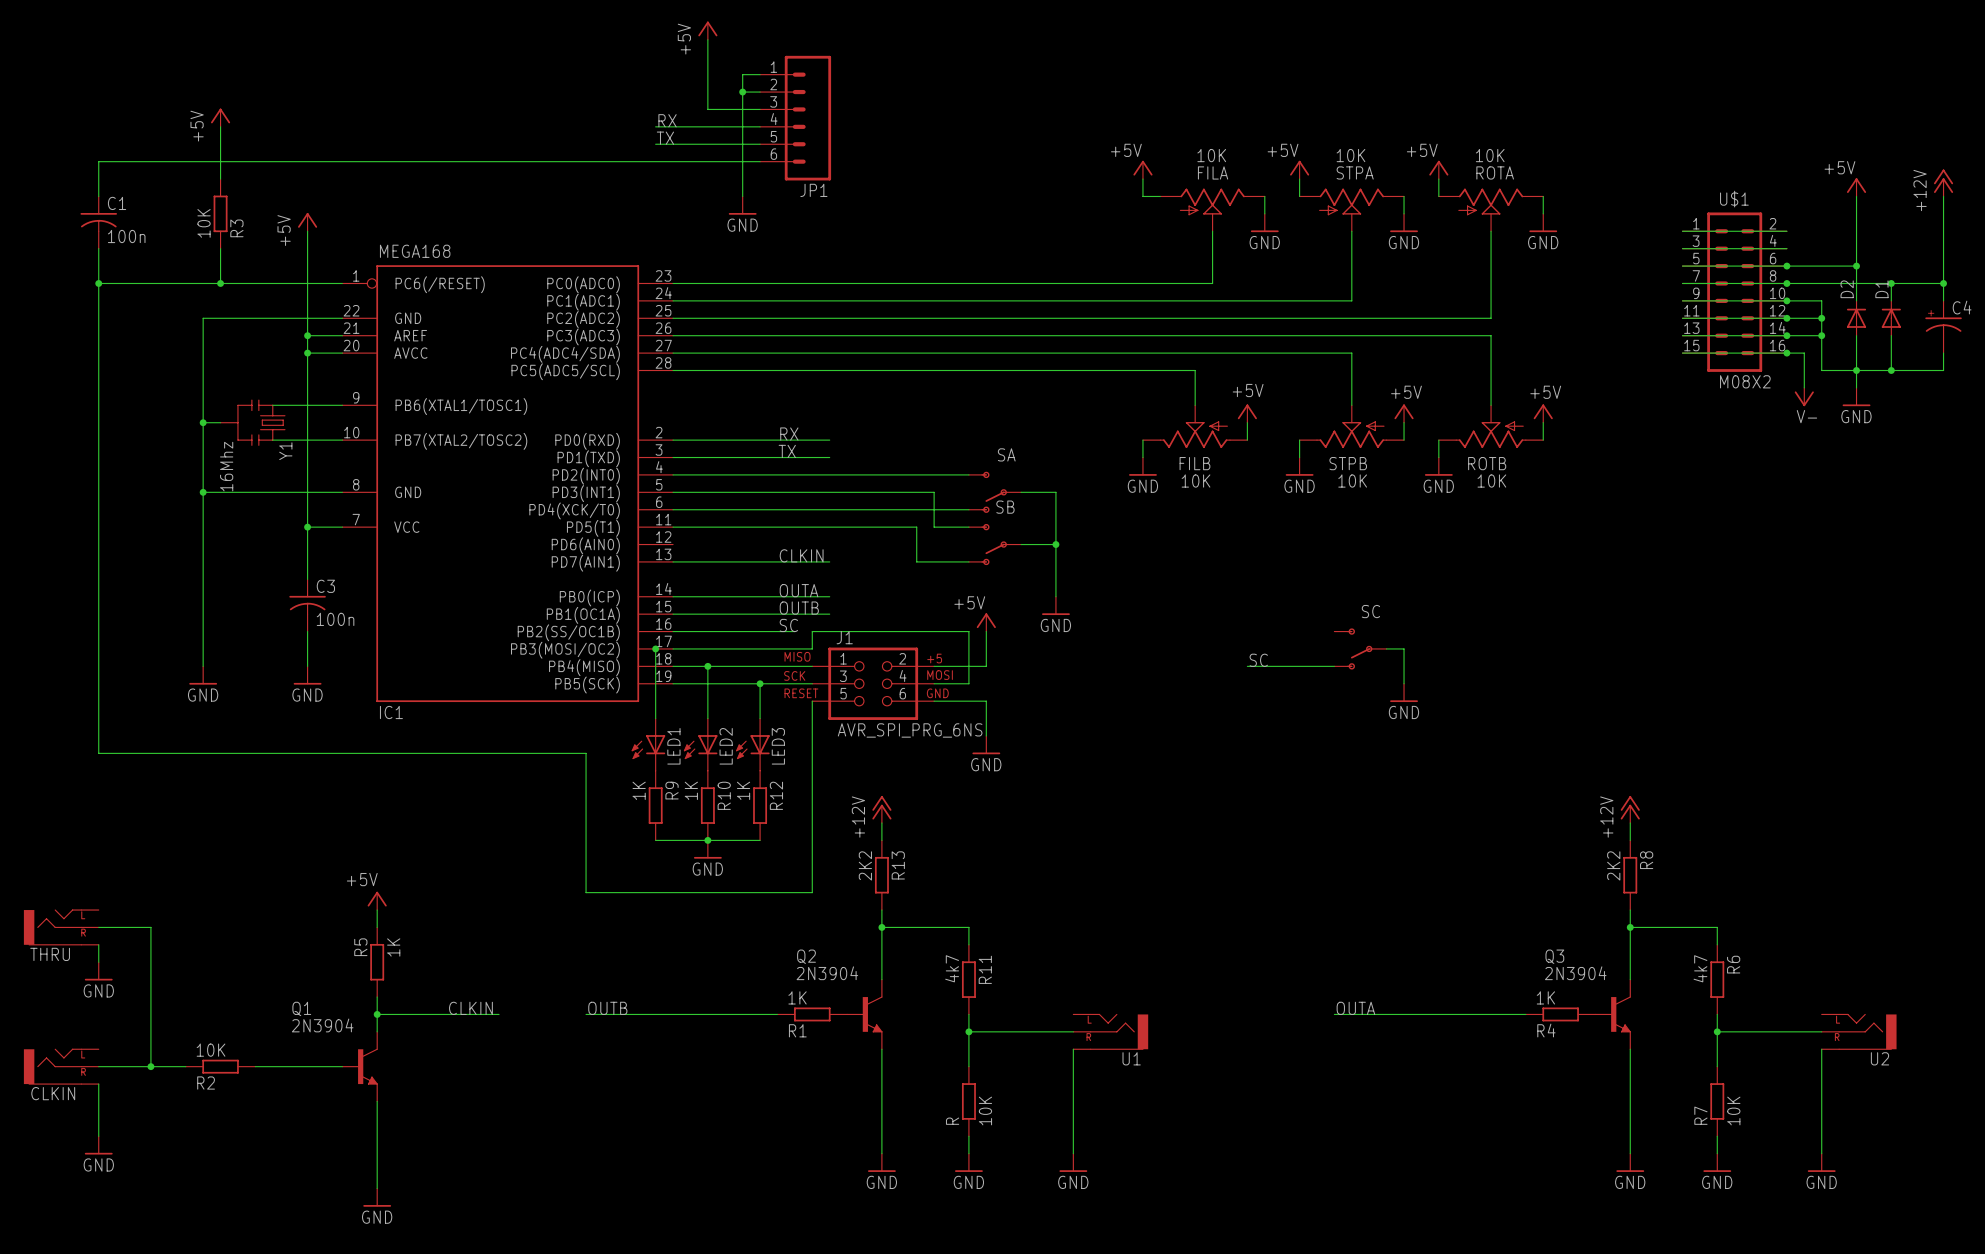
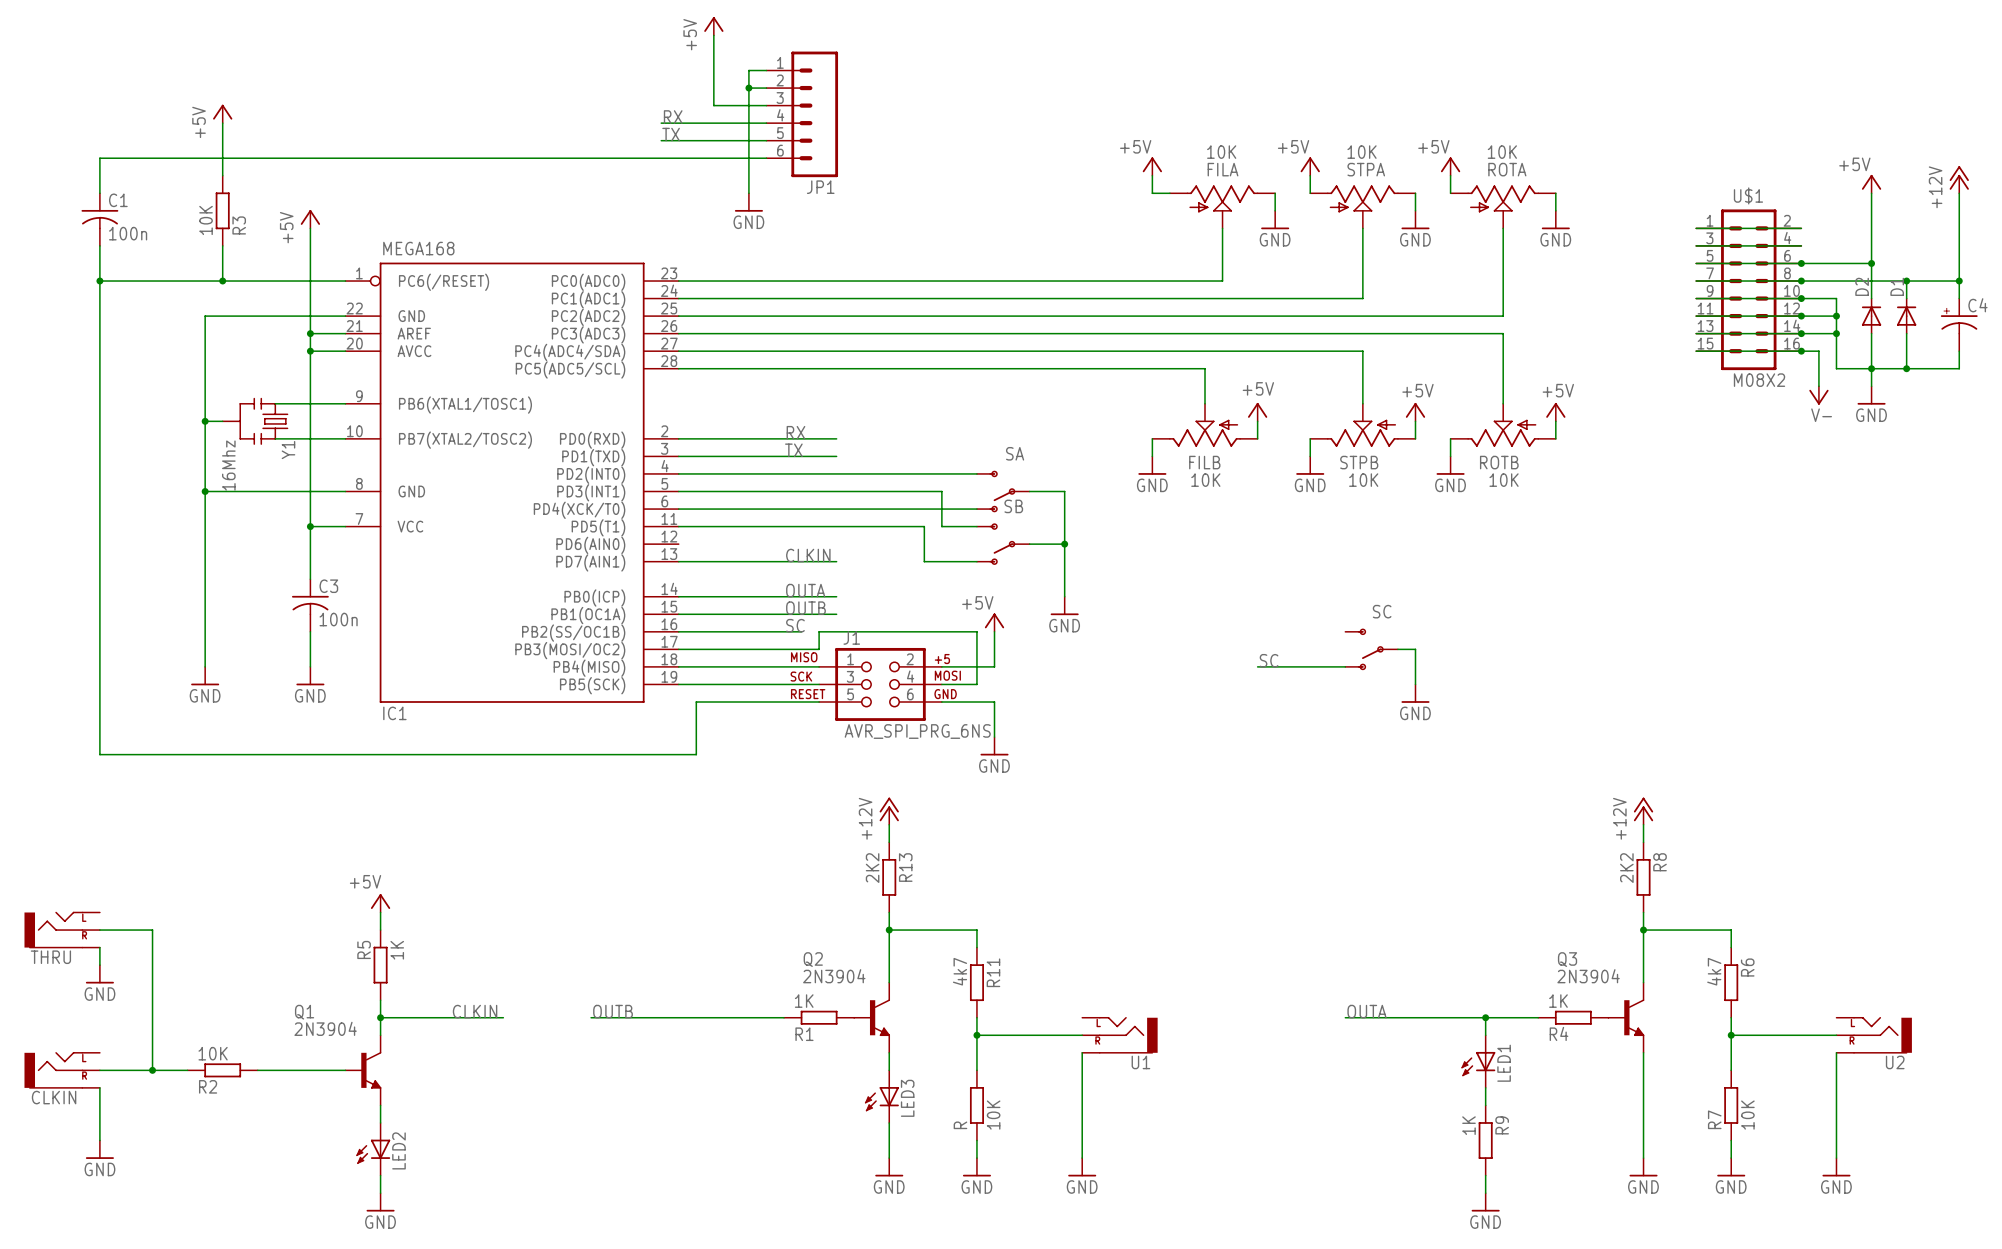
wire: (655, 648) (655, 718) -> none
junction: (655, 648) -> none
wire: (707, 666) (707, 718) -> none
junction: (707, 666) -> none
wire: (760, 683) (760, 718) -> none
junction: (760, 683) -> none
wire: (812, 701) (812, 892) (586, 892) (586, 753) -> (819, 701) (696, 701) (696, 754) (591, 754)
LED1 position: (648, 744) -> (1478, 1061)
LED2 position: (700, 744) -> (373, 1149)
LED3 position: (752, 744) -> (881, 1096)
R9 position: (655, 805) -> (1485, 1140)
R10: 1K (707, 805) -> none
R12: 1K (760, 805) -> none
wire: (655, 840) (760, 840) -> none
junction: (707, 840) -> none
power symbol: GND (707, 849) -> none
wire: none -> (1485, 1017) (1485, 1035)
junction: none -> (1485, 1017)
wire: none -> (1485, 1087) (1485, 1105)
wire: none -> (1485, 1175) (1485, 1193)
power symbol: none -> GND (1485, 1202)

